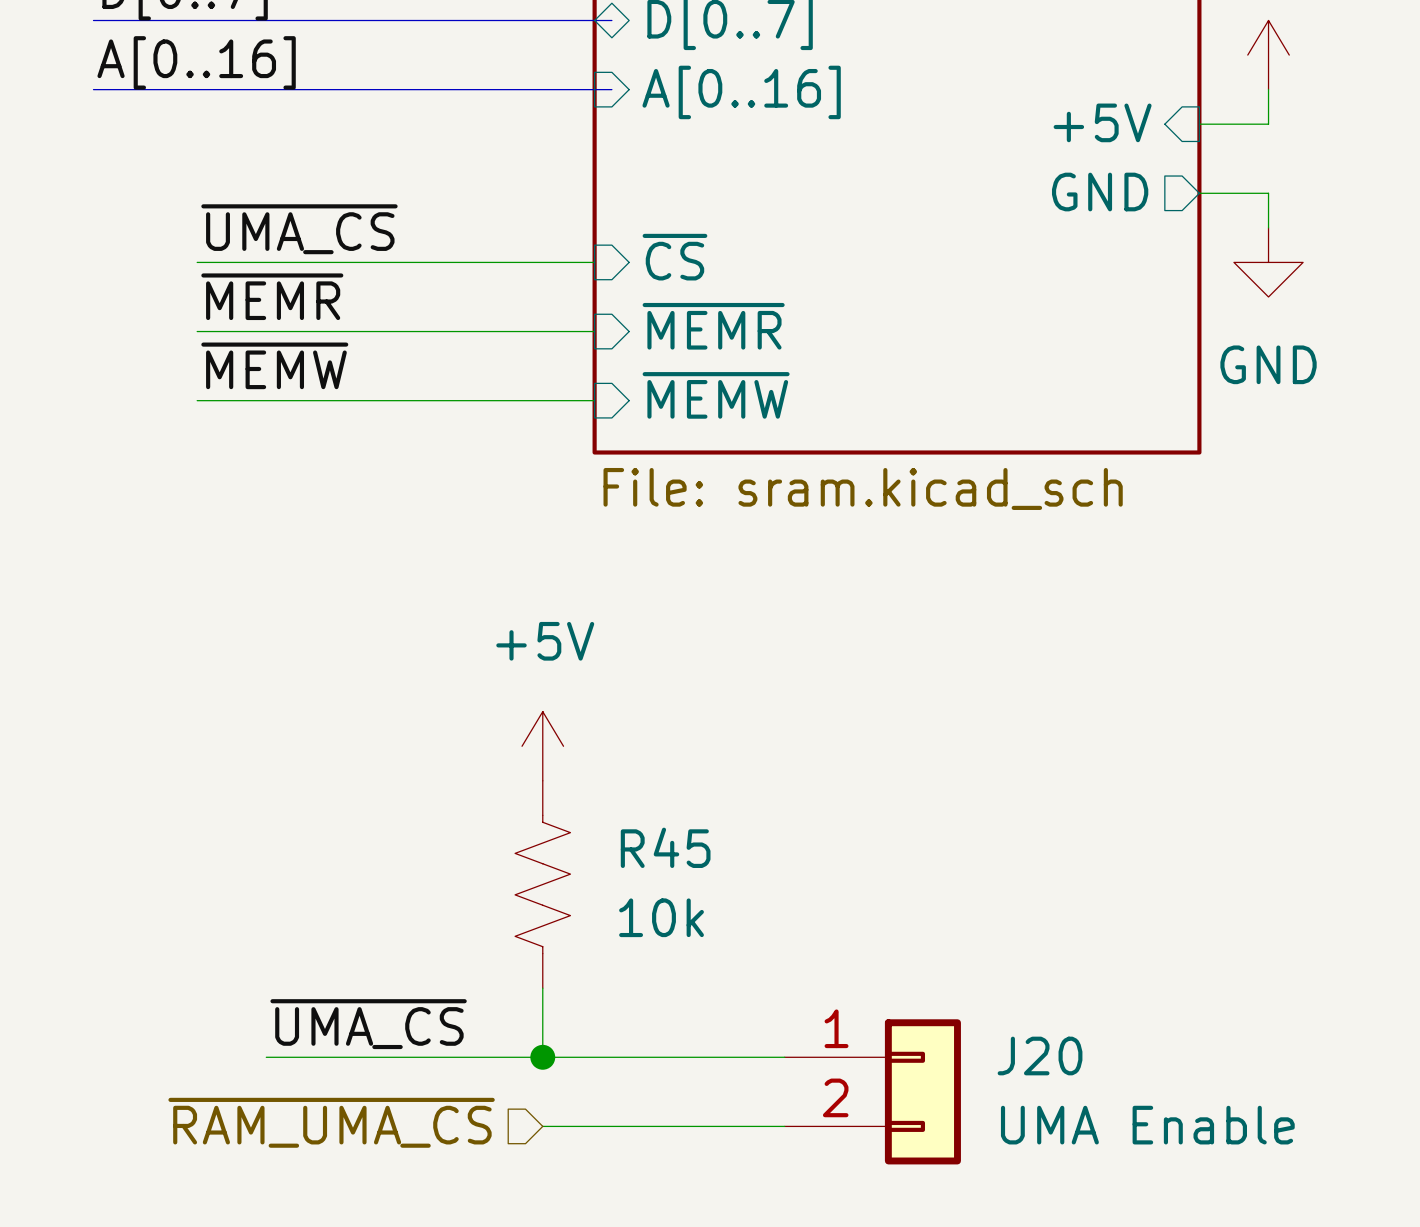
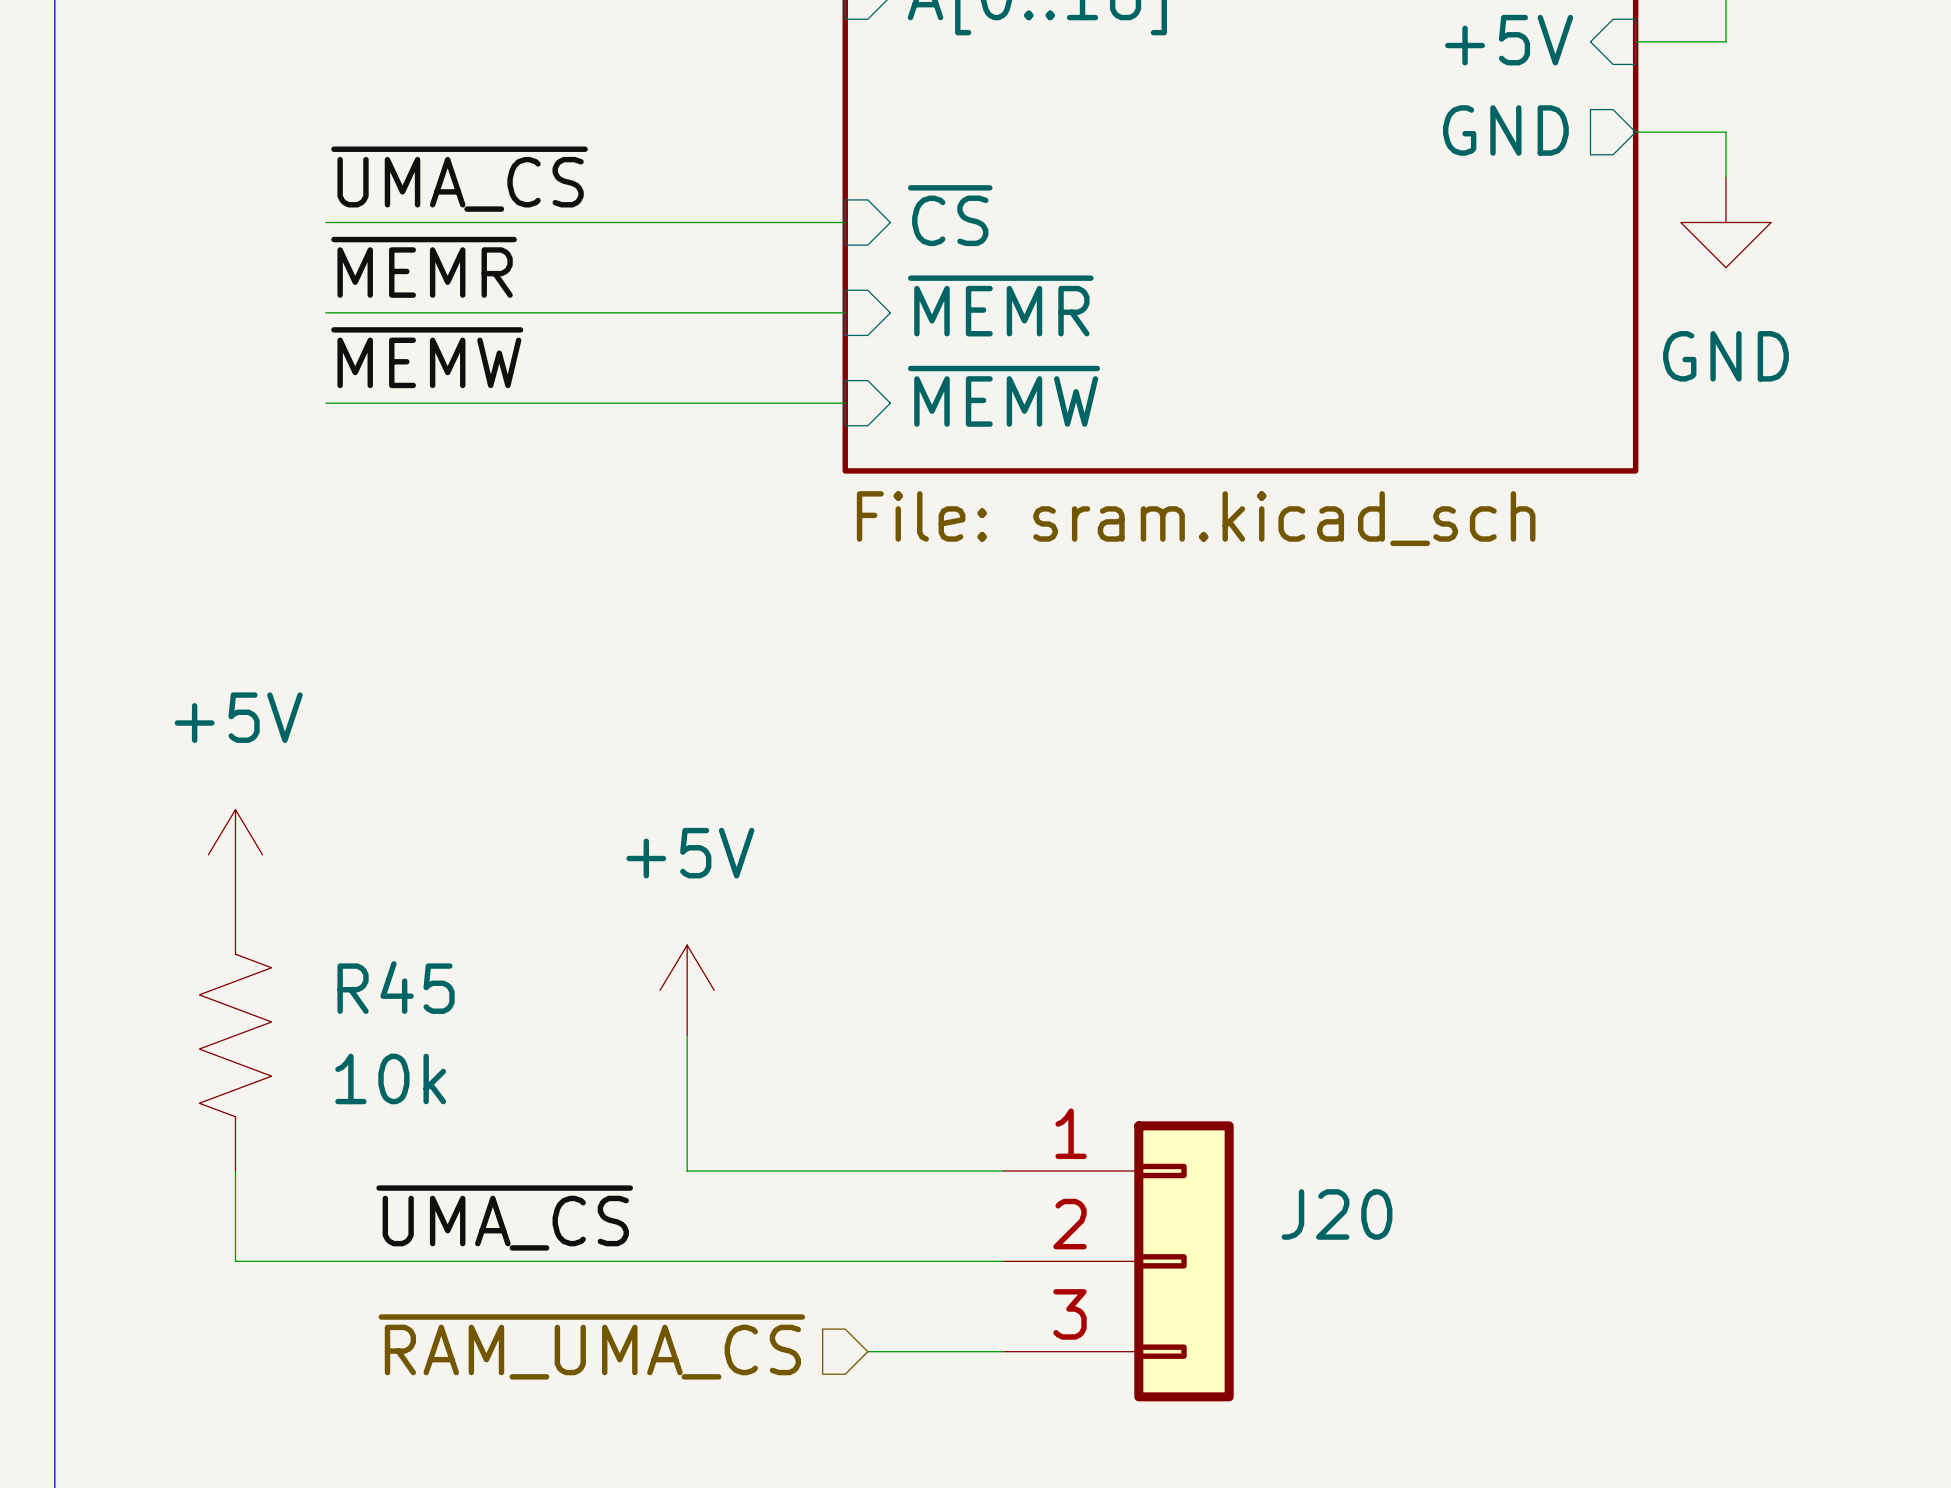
power symbol: none -> +5V (235, 854)
power symbol position: +5V (542, 746) -> +5V (687, 990)
wire: none -> (687, 1035) (687, 1171) (1003, 1171)
R45 position: (542, 884) -> (235, 1035)
wire: none -> (235, 1171) (235, 1261) (416, 1261)
wire: (542, 988) (542, 1057) -> none
J20 symbol: [784, 1019, 961, 1165] -> [1003, 1121, 1234, 1402]
label position: ~{UMA_CS} (368, 1024) -> ~{UMA_CS} (504, 1217)
junction: (542, 1057) -> none
hierarchical label position: ~{RAM_UMA_CS} (331, 1122) -> ~{RAM_UMA_CS} (591, 1346)
J20 value: UMA Enable (1147, 1125) -> none
wire: (542, 1126) (611, 1126) -> none

